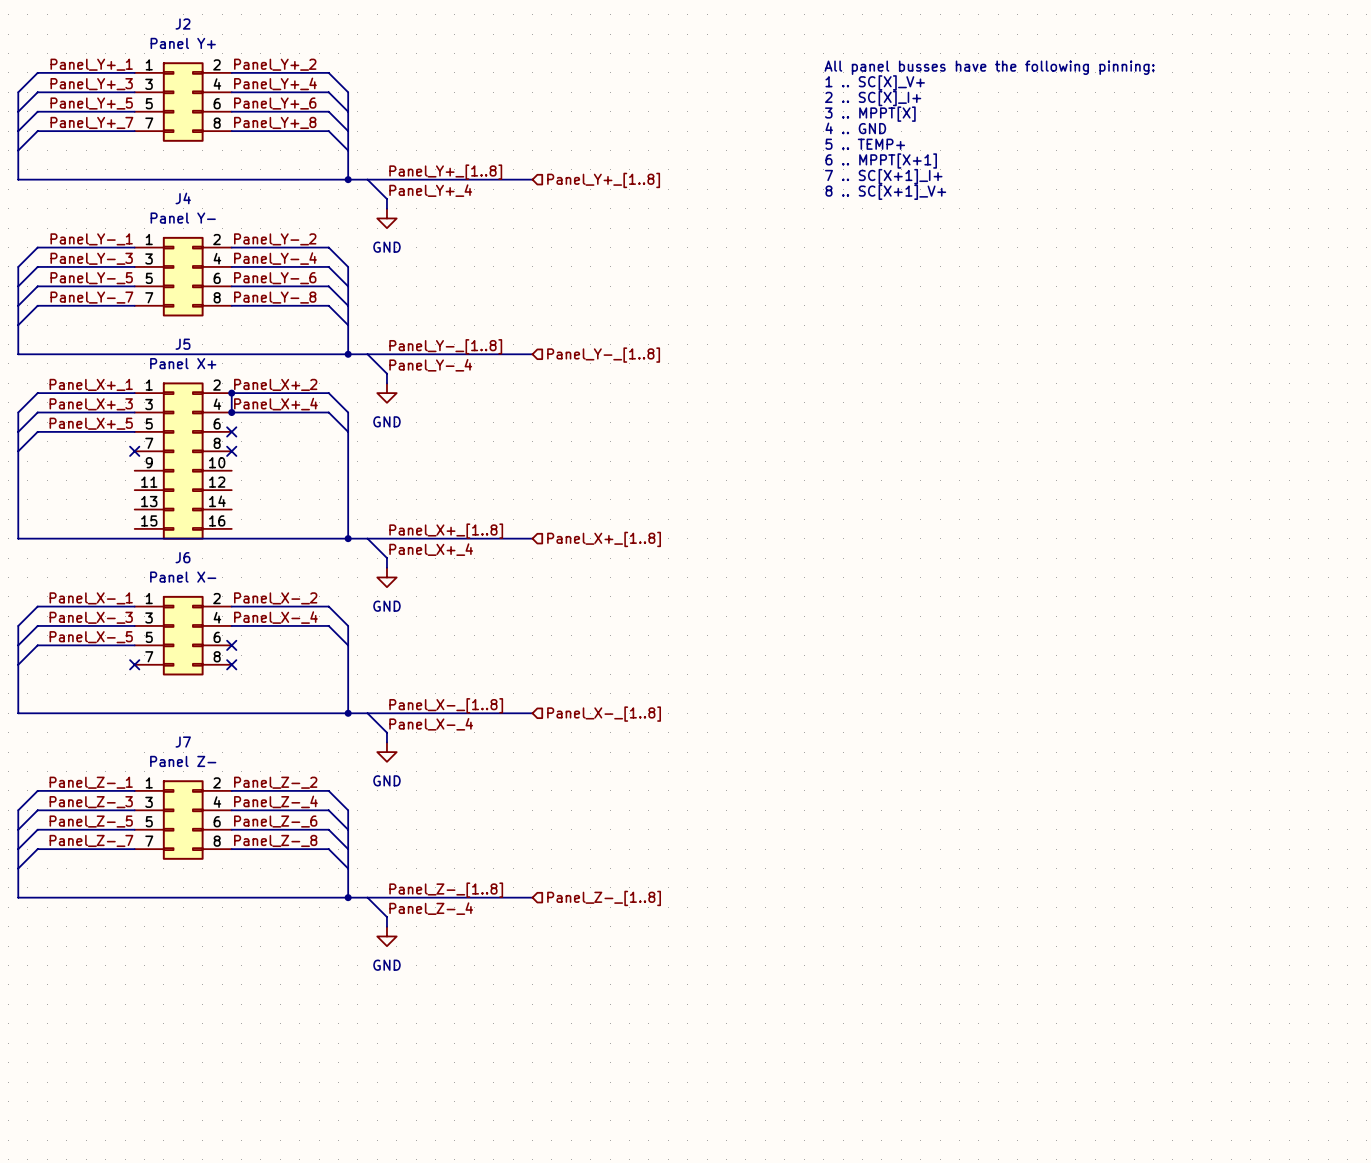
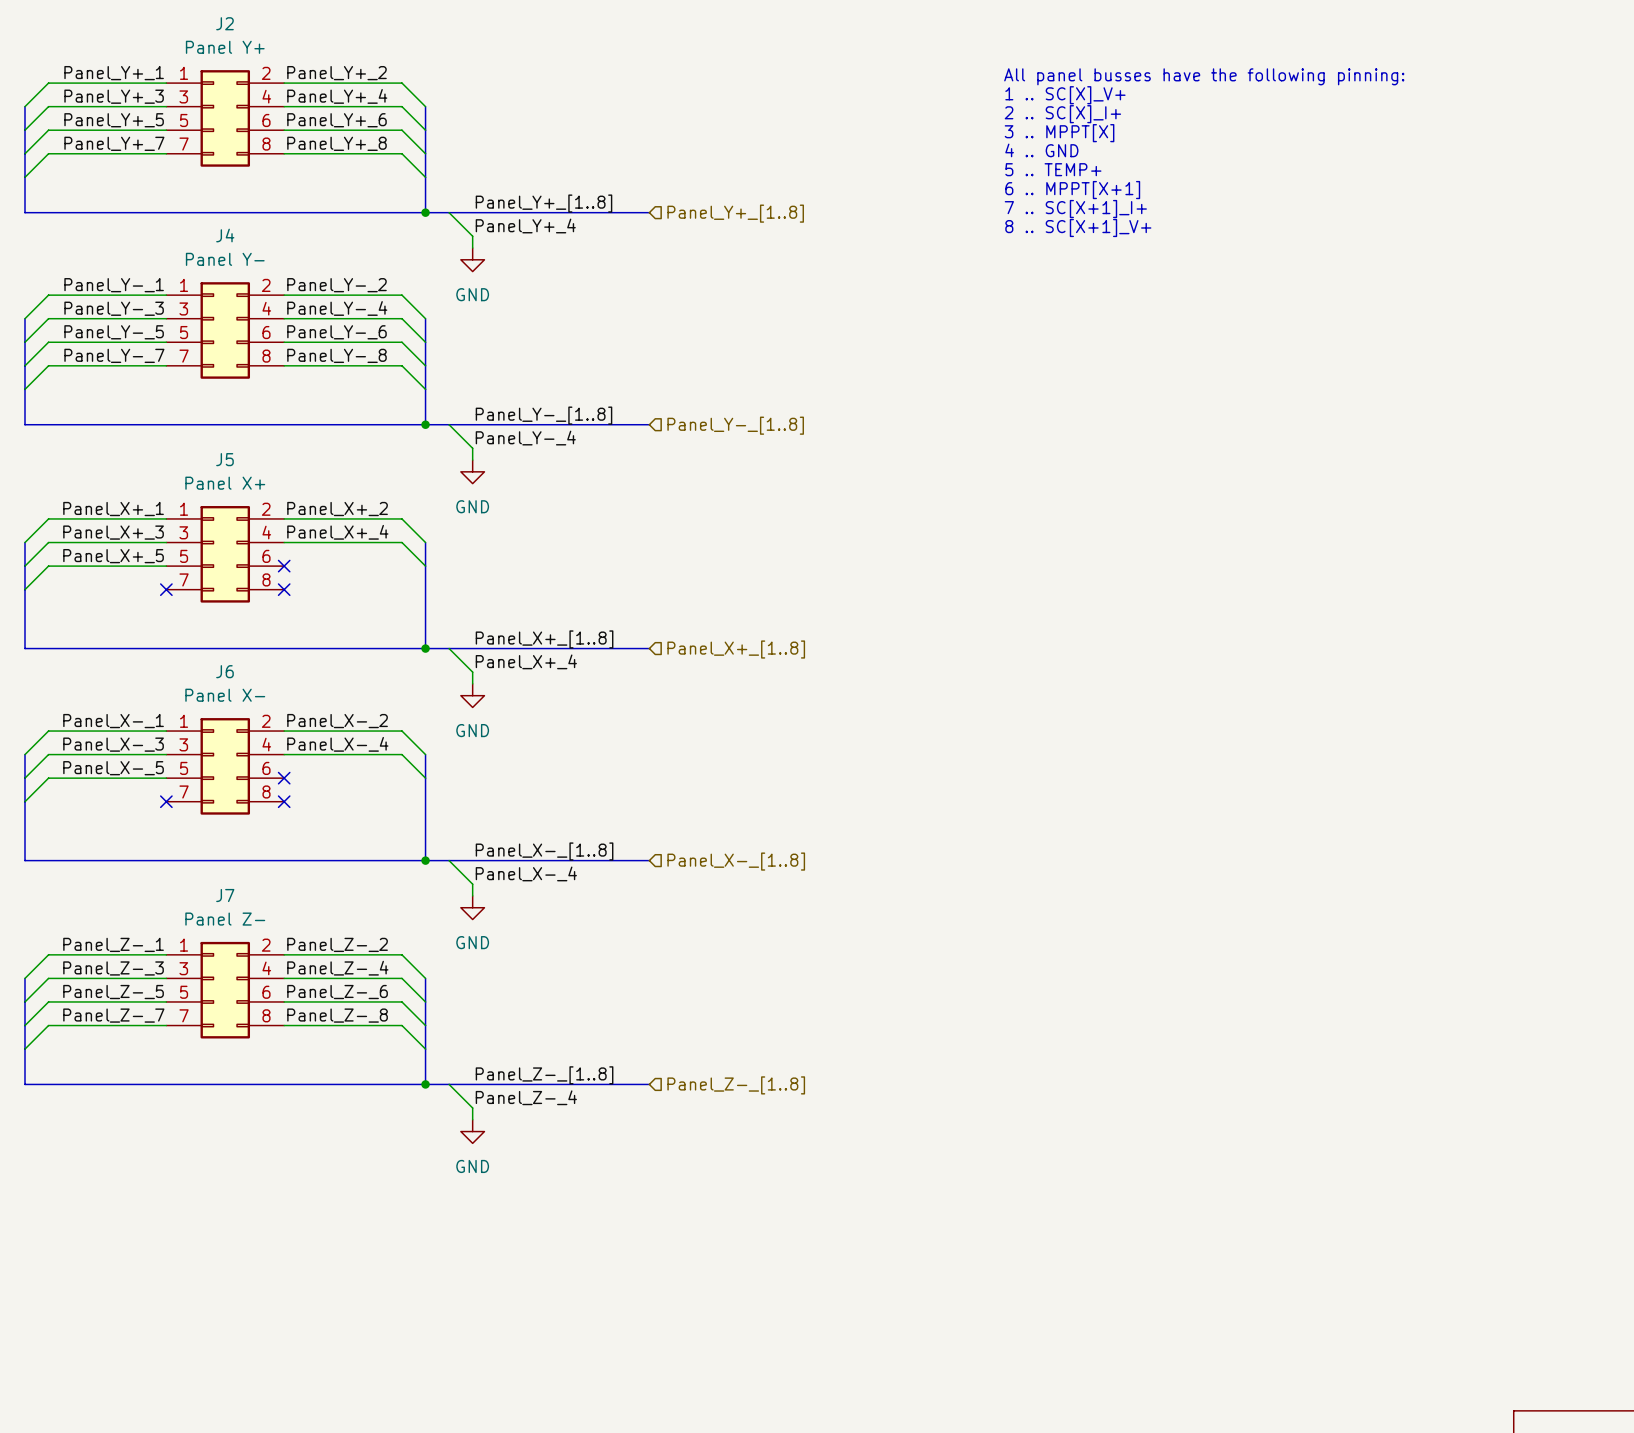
J5 name position: J5 (182, 344) -> J5 (224, 459)
J5 value position: Panel X+ (183, 363) -> Panel X+ (225, 483)
J5 symbol: [134, 382, 232, 540] -> [166, 506, 285, 603]
label: Panel_X+_1 (91, 384) -> none
label position: Panel_X+_2 (275, 384) -> Panel_X+_2 (337, 509)
wire: (134, 393) (37, 393) (18, 412) -> (166, 542) (48, 542) (25, 566)
junction: (231, 393) -> none
label position: Panel_X+_3 (91, 404) -> Panel_X+_3 (113, 532)
label position: Panel_X+_4 (275, 404) -> Panel_X+_4 (337, 532)
bus: (18, 412) (18, 451) -> none
wire: (134, 412) (37, 412) (18, 431) -> (166, 566) (48, 566) (25, 589)
junction: (231, 412) -> none
wire: (348, 412) (328, 393) (231, 393) (231, 412) (328, 412) (348, 431) -> none
bus: (348, 412) (348, 451) -> none
label: Panel_X+_5 (91, 423) -> Panel_X+_1 (113, 509)
wire: none -> (284, 518) (401, 518) (425, 542)
no-connect mark: (231, 431) -> none
no-connect mark position: (134, 451) -> (166, 589)
wire: none -> (284, 542) (401, 542) (425, 566)
no-connect mark: (231, 451) -> none
label: none -> Panel_X+_5 (113, 556)
no-connect mark: none -> (284, 566)
no-connect mark: none -> (284, 589)

